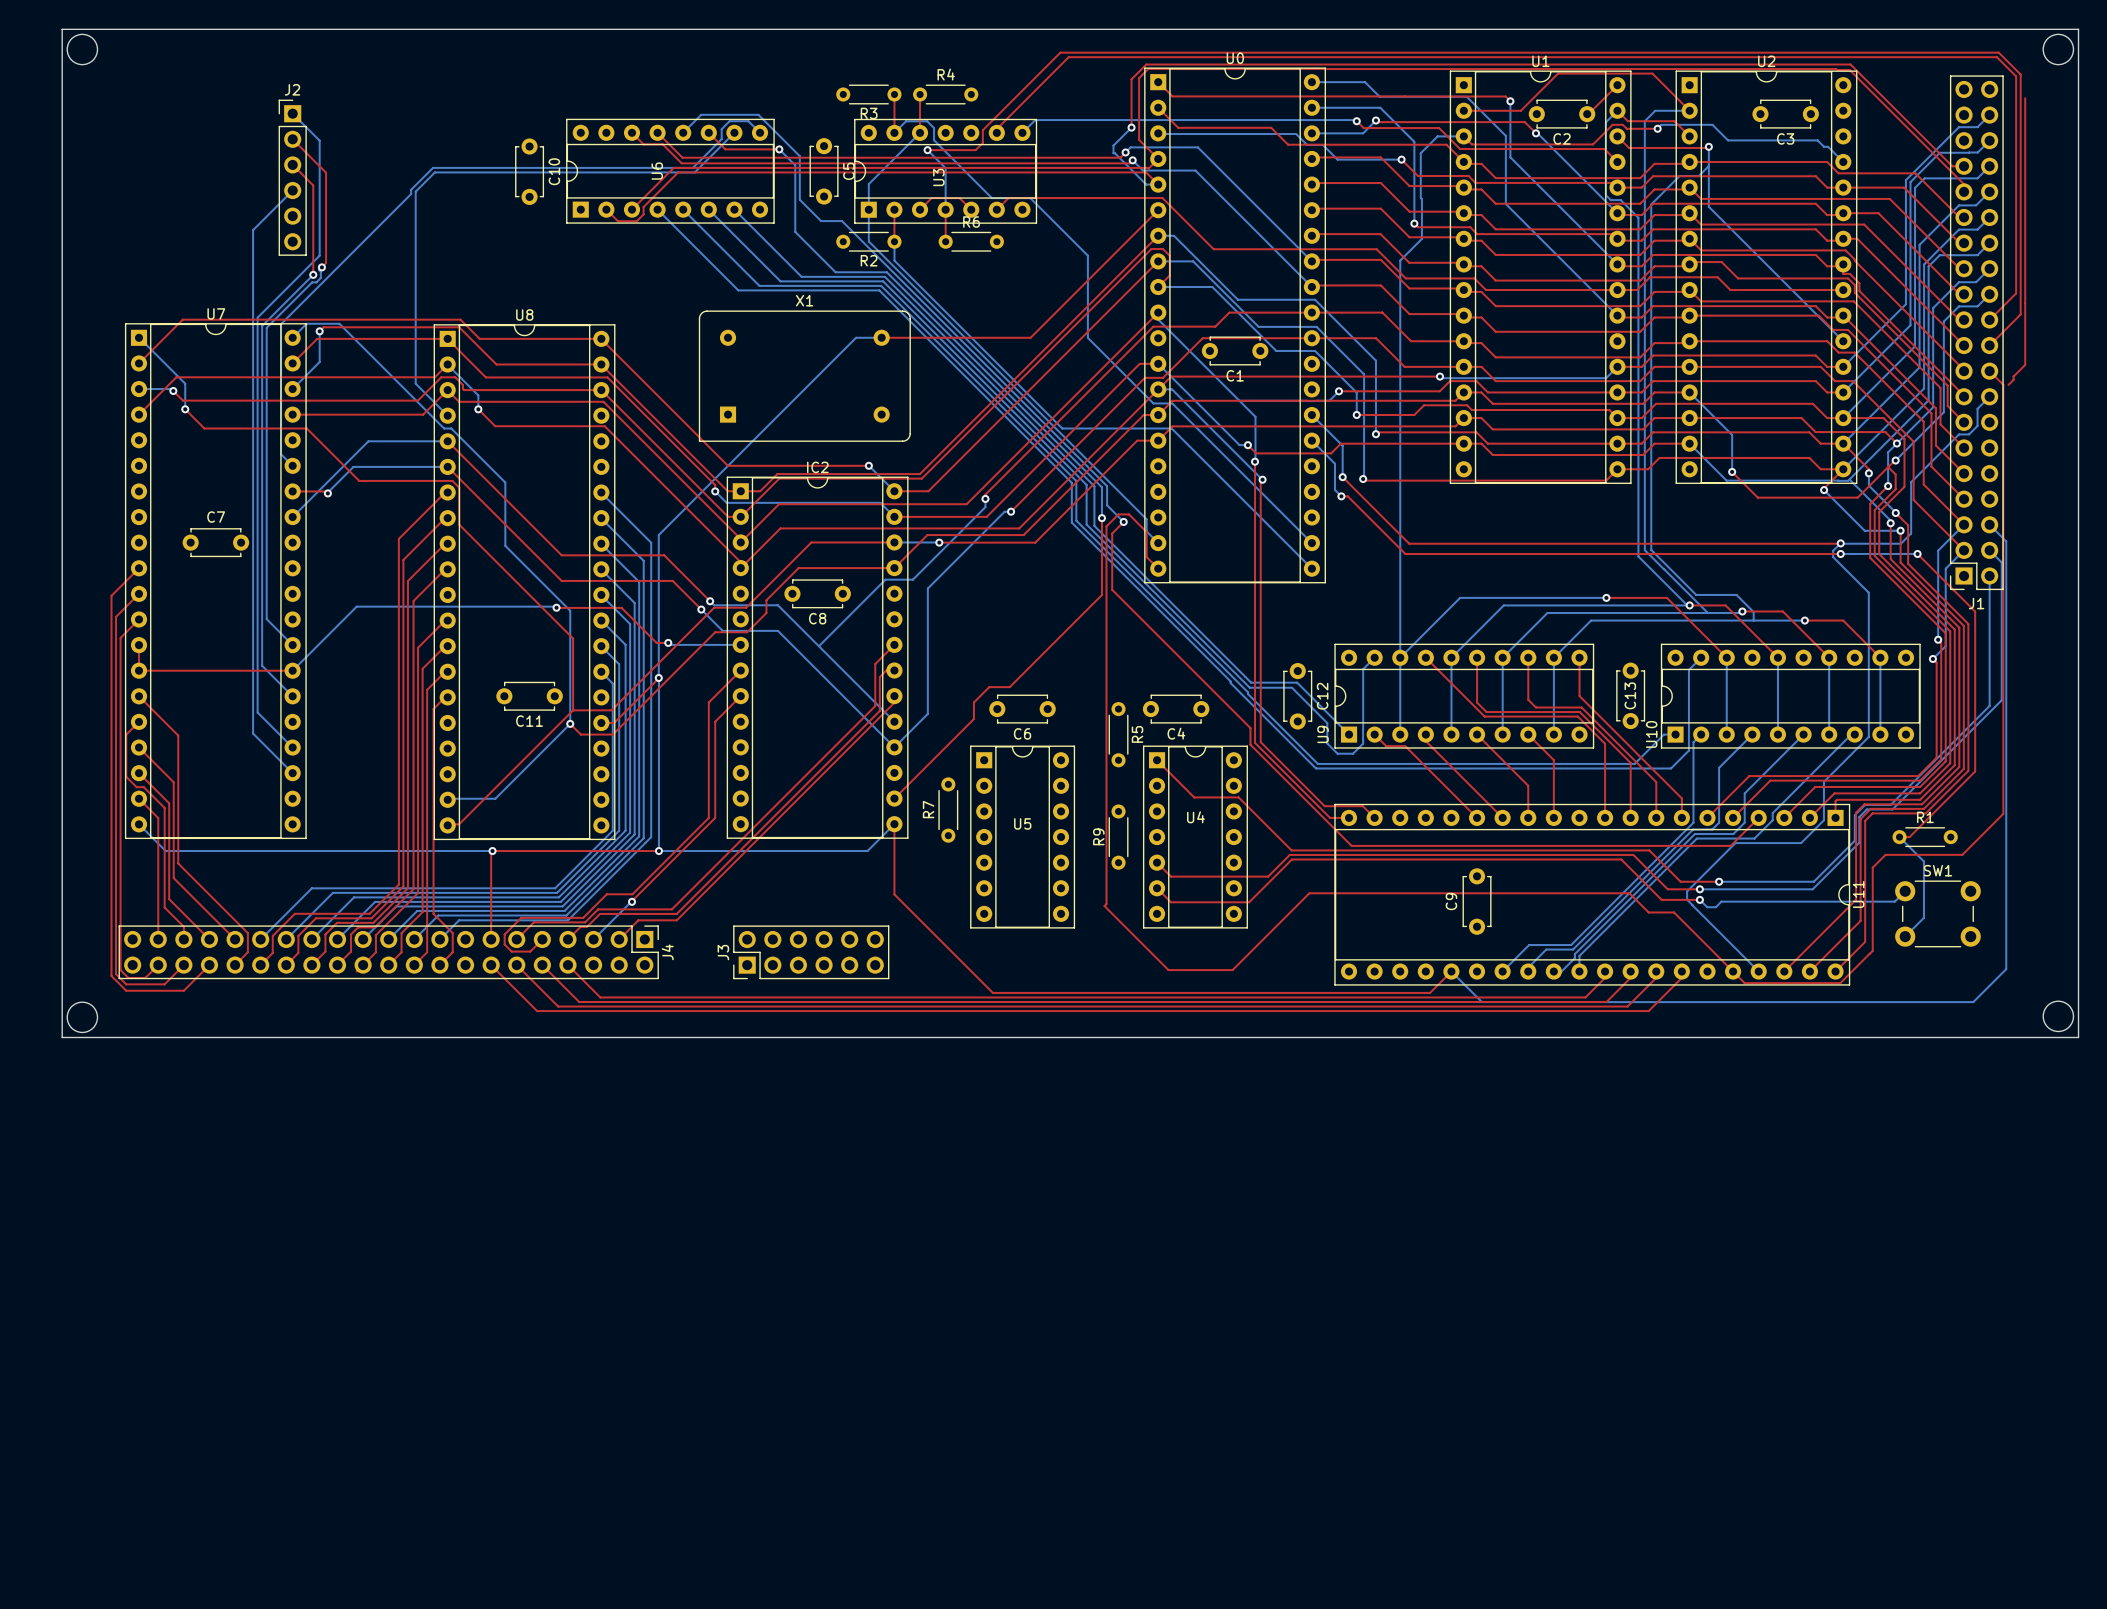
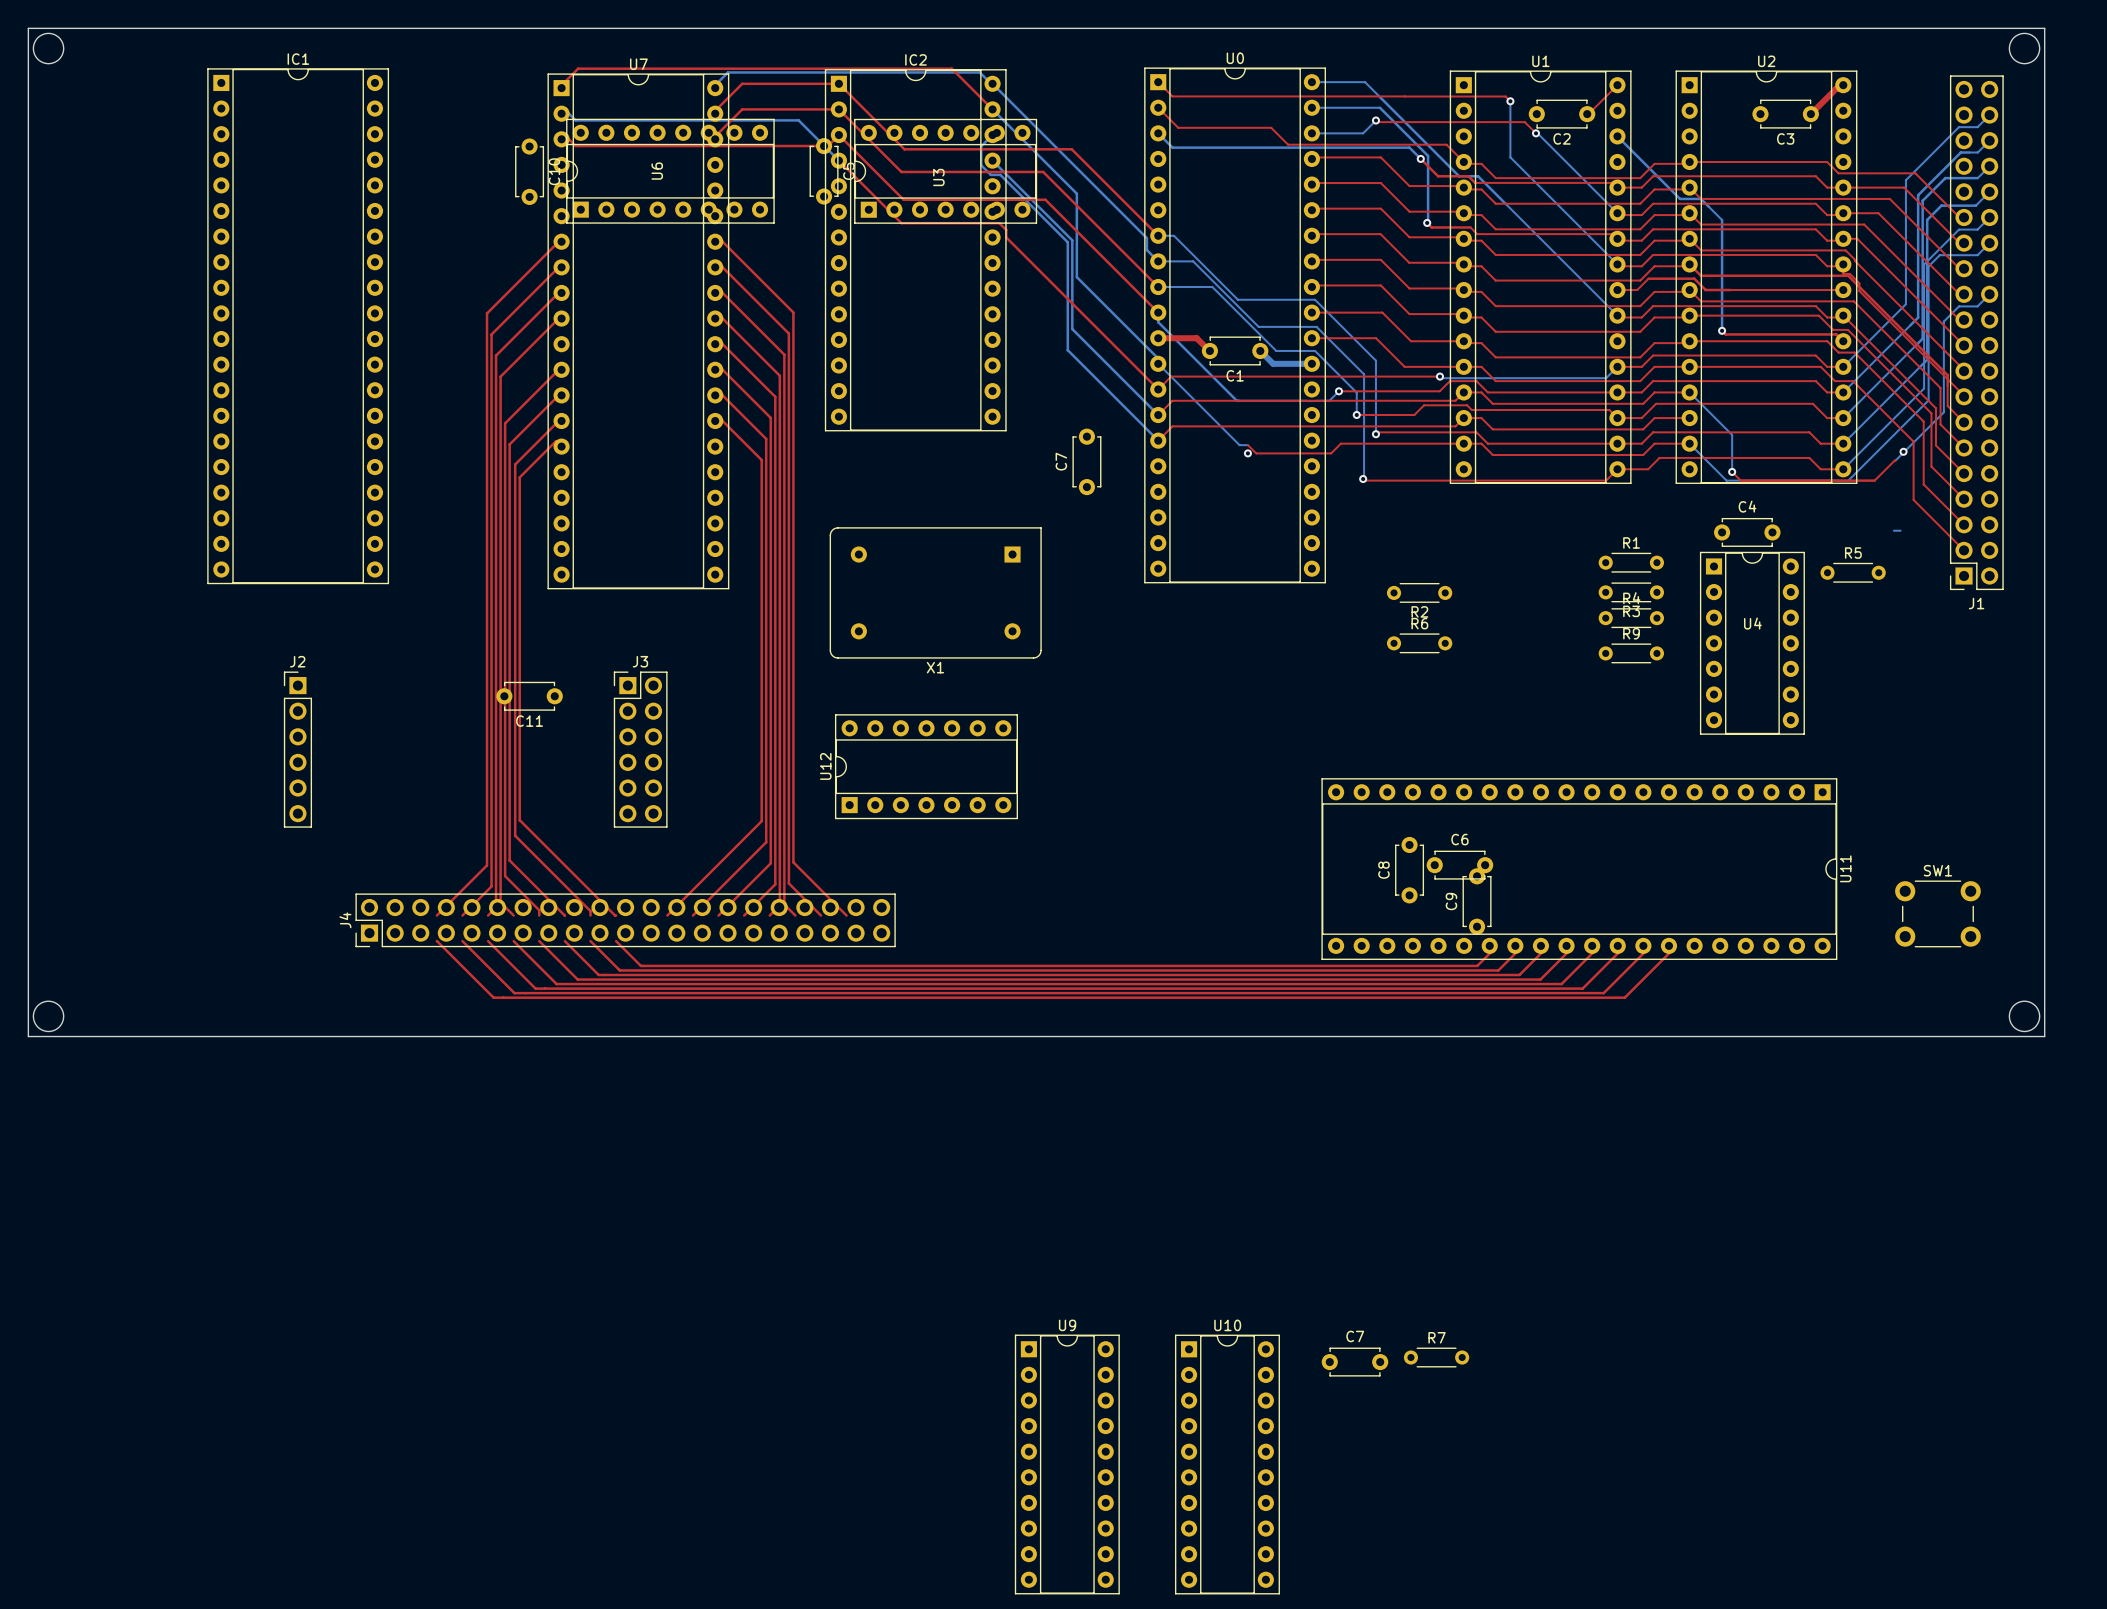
board edge: (62, 29) (2078, 29) (2078, 1037) (62, 1037) (62, 29) -> (28, 28) (2044, 28) (2044, 1036) (28, 1036) (28, 28)
round board edge position: (82, 49) -> (48, 48)
round board edge position: (2058, 49) -> (2024, 48)
top track: none -> (563, 82) (578, 68) (951, 68) (992, 109)
bottom track: none -> (717, 82) (727, 72) (979, 72) (1146, 238) (1146, 250) (1158, 261)
top track: none -> (1843, 85) (1839, 88) (1836, 88) (1810, 114)
R3 position: (868, 94) -> (1631, 592)
top track: (894, 94) (894, 132) -> none
top track: (920, 94) (920, 132) -> none
R4 position: (945, 94) -> (1631, 618)
bottom track: (1379, 96) (1466, 96) (1505, 135) (1505, 204) -> (1379, 96) (1459, 176) (1478, 176) (1505, 204)
top track: (2025, 98) (2025, 364) (2008, 384) -> none
bottom track: (1379, 107) (1414, 141) (1414, 223) -> (1379, 107) (1428, 155) (1427, 222)
bottom track: none -> (563, 108) (575, 120) (798, 120) (838, 160)
bottom track: none -> (992, 109) (1076, 193) (1076, 277) (1158, 358) (1158, 363)
top track: (1463, 110) (1520, 110) (1558, 73) (1652, 73) (1689, 110) -> none
top track: (1617, 110) (1627, 121) (1674, 121) (1689, 136) -> none
bottom track: (1617, 110) (1605, 122) (1605, 195) (1610, 200) (1620, 200) (1638, 217) (1638, 556) (1687, 605) -> none
bottom track: (1689, 110) (1655, 110) (1644, 121) (1644, 550) (1664, 569) -> none
bottom track: (292, 113) (319, 140) (319, 255) (257, 317) (257, 712) (292, 747) -> none
top track: (1356, 121) (1363, 128) (1439, 128) (1460, 148) (1604, 148) (1617, 162) -> none
bottom track: (1356, 121) (1035, 120) (1022, 132) -> none
via: (1356, 121) -> none
top track: (1131, 127) (1131, 79) (1146, 64) (1850, 64) (1952, 166) (1964, 166) -> none
bottom track: (1131, 127) (1113, 145) (1113, 153) (1146, 184) (1158, 184) -> none
via: (1131, 127) -> none
top track: (1657, 128) (1626, 128) (1622, 124) (1612, 124) (1593, 144) (1471, 144) (1463, 136) -> none
bottom track: (1657, 128) (1661, 124) (1712, 124) (1728, 140) (1817, 140) (1824, 146) (1828, 146) (1843, 162) -> none
via: (1657, 128) -> none
top track: (632, 132) (643, 144) (662, 144) (681, 163) (1129, 163) (1132, 160) -> none
top track: (657, 132) (682, 157) (1120, 157) (1125, 152) -> none
bottom track: (683, 132) (701, 114) (758, 114) (799, 156) (799, 199) (821, 221) (842, 221) (1107, 486) (1107, 505) (1123, 521) -> none
top track: (708, 132) (725, 149) (779, 149) -> none
bottom track: (734, 132) (694, 172) (434, 172) (415, 191) (415, 383) (447, 415) -> none
bottom track: (760, 132) (748, 121) (729, 121) (721, 129) (721, 139) (692, 167) (433, 167) (411, 189) (411, 194) (281, 324) (281, 454) (292, 465) -> none
bottom track: (894, 132) (906, 121) (927, 121) (934, 128) (934, 140) (991, 198) (1030, 198) (1087, 255) (1087, 337) (1153, 403) (1172, 403) (1311, 543) -> none
bottom track: (920, 132) (868, 184) (868, 241) (1146, 519) (1146, 531) (1158, 543) -> none
top track: (996, 132) (996, 129) (1068, 57) (1996, 57) (2016, 76) (2016, 293) (1989, 319) -> none
bottom track: (1158, 134) (1296, 134) (1307, 144) (1322, 144) (1337, 159) (1401, 159) -> (1158, 134) (1172, 147) (1409, 147) (1420, 158)
bottom track: none -> (992, 135) (981, 146) (981, 165) (990, 174) (1000, 174) (1067, 242) (1067, 350) (1158, 440)
bottom track: (1463, 136) (1437, 136) (1420, 153) (1421, 238) (1400, 260) (1400, 734) -> none
top track: (1617, 136) (1629, 147) (1708, 146) -> none
top track: (292, 139) (326, 172) (326, 263) (321, 267) -> none
bottom track: (1708, 146) (1708, 206) -> (1617, 136) (1680, 198) (1700, 198) (1708, 206)
via: (1708, 146) -> none
bottom track: (779, 149) (795, 165) (795, 231) (835, 272) (886, 272) (1101, 487) (1101, 518) -> none
via: (779, 149) -> none
top track: (927, 150) (975, 150) (982, 143) (982, 130) (1060, 52) (1998, 52) (2020, 74) (2020, 314) (1989, 345) -> none
bottom track: (927, 150) (945, 168) (945, 209) -> none
via: (927, 150) -> none
bottom track: (1125, 152) (1130, 147) (1197, 147) (1311, 261) -> none
via: (1125, 152) -> none
bottom track: (1969, 152) (1939, 152) (1910, 182) (1910, 325) -> (1969, 152) (1960, 152) (1918, 195) (1918, 317) (1910, 325)
top track: (1401, 159) (1417, 176) (1468, 176) (1475, 182) -> (1420, 158) (1438, 176) (1468, 176) (1475, 182)
via position: (1401, 159) -> (1420, 158)
bottom track: none -> (992, 160) (1072, 240) (1072, 329) (1158, 415)
bottom track: (1132, 160) (1142, 170) (1195, 170) (1311, 287) -> none
via: (1132, 160) -> none
top track: (292, 164) (313, 185) (313, 274) -> none
bottom track: (1708, 166) (1698, 176) (1679, 176) (1651, 204) (1651, 549) (1696, 594) (1736, 594) (1753, 612) (1753, 620) -> none
J2 position: (292, 177) -> (297, 749)
bottom track: (1977, 178) (1924, 178) (1915, 187) (1915, 346) -> (1977, 178) (1945, 178) (1922, 200) (1922, 338) (1915, 346)
top track: (1158, 184) (1146, 172) (678, 172) (643, 207) (643, 214) (636, 221) (617, 221) (606, 209) -> none
bottom track: (292, 190) (253, 230) (253, 733) (292, 773) -> none
top track: (1964, 191) (1964, 184) (1849, 70) (1148, 69) (1139, 78) (1139, 139) (1158, 158) (1148, 168) (673, 167) (632, 209) -> none
bottom track: (1976, 205) (1959, 205) (1919, 244) (1919, 367) -> (1976, 205) (1941, 205) (1927, 219) (1927, 359) (1919, 367)
bottom track: (657, 209) (738, 290) (879, 290) (1071, 482) (1071, 522) (1316, 768) (1671, 768) (1688, 750) (1688, 669) (1701, 657) -> none
bottom track: (683, 209) (759, 285) (881, 285) (1076, 481) (1076, 520) (1317, 763) (1634, 763) (1663, 734) (1675, 734) -> none
bottom track: (708, 209) (780, 281) (883, 281) (1086, 484) (1086, 524) (1249, 687) (1291, 687) (1327, 723) (1327, 743) (1337, 753) (1353, 753) (1363, 743) (1363, 739) -> none
bottom track: (734, 209) (801, 276) (884, 276) (1094, 486) (1094, 525) (1251, 682) (1297, 682) (1349, 734) -> none
top track: (894, 209) (894, 241) -> none
top track: (920, 209) (931, 198) (959, 198) (971, 209) -> none
top track: (945, 209) (945, 241) -> none
top track: (996, 209) (1008, 198) (1162, 198) (1213, 249) (1376, 249) (1405, 278) (1474, 278) (1486, 290) (1617, 290) -> none
top track: (1158, 210) (1030, 337) (881, 337) -> none
bottom track: (1722, 220) (1843, 341) -> (1722, 220) (1722, 330)
top track: (1414, 223) (1417, 227) (1470, 227) -> (1427, 222) (1431, 227) (1470, 227)
via position: (1414, 223) -> (1427, 222)
top track: (1158, 235) (919, 474) (777, 474) (760, 491) (727, 491) (599, 363) -> (1158, 235) (1071, 149) (904, 149) (838, 83) (742, 83) (717, 108)
top track: none -> (563, 236) (487, 313) (487, 865) (436, 915)
top track: none -> (717, 236) (793, 312) (793, 862) (846, 915)
R2 position: (868, 241) -> (1419, 592)
bottom track: (894, 241) (894, 260) (1062, 428) (1171, 428) (1311, 568) -> none
R6 position: (971, 241) -> (1419, 643)
top track: (1158, 261) (928, 491) (894, 491) -> none
top track: none -> (563, 262) (491, 334) (491, 886) (462, 915)
top track: none -> (717, 262) (788, 333) (788, 883) (820, 915)
top track: (1689, 264) (1692, 262) (1721, 262) (1738, 278) (1848, 278) (1854, 285) (1854, 292) (1947, 385) -> (1689, 264) (1700, 275) (1848, 275) (1947, 375) (1947, 385)
bottom track: (321, 267) (319, 270) (320, 277) (316, 282) (312, 282) (266, 327) (266, 619) (292, 645) -> none
via: (321, 267) -> none
bottom track: (1989, 268) (1976, 282) (1959, 282) (1933, 308) (1933, 407) (1888, 452) (1888, 486) -> none
bottom track: (313, 274) (262, 325) (262, 665) (292, 696) -> none
via: (313, 274) -> none
top track: (1648, 278) (1717, 277) (1730, 290) -> (1648, 278) (1694, 278) (1705, 290) (1730, 290)
top track: none -> (563, 287) (496, 355) (496, 907) (488, 915)
top track: none -> (717, 287) (784, 354) (784, 904) (795, 915)
top track: (1158, 287) (1169, 275) (1169, 255) (1163, 249) (1151, 249) (921, 478) (779, 478) (740, 516) (727, 516) (601, 390) (464, 390) (462, 384) (455, 377) (441, 377) (417, 400) (182, 400) (173, 391) -> (1158, 287) (1043, 171) (901, 171) (838, 109) (742, 109) (717, 134)
top track: (1158, 312) (966, 504) (779, 504) (740, 542) (740, 539) (603, 401) (459, 401) (446, 389) -> (1158, 312) (1045, 199) (903, 199) (838, 135) (827, 146) (575, 146) (563, 134)
top track: (1311, 312) (1229, 312) (1215, 326) (1153, 326) (985, 494) (985, 498) -> none
top track: none -> (563, 313) (500, 376) (500, 902) (513, 915)
top track: none -> (717, 313) (779, 375) (779, 905) (769, 915)
bottom track: (1158, 319) (1255, 416) (1255, 461) -> (1158, 319) (1158, 322) (1236, 400) (1239, 400)
IC1: none -> (298, 326)
top track: none -> (1722, 330) (1725, 334) (1836, 334) (1843, 341)
via: none -> (1722, 330)
top track: (319, 331) (323, 327) (459, 327) (496, 364) (601, 364) -> none
bottom track: (319, 331) (319, 362) (292, 389) -> none
via: (319, 331) -> none
bottom track: (139, 337) (185, 383) (185, 409) -> none
bottom track: (292, 337) (306, 323) (339, 323) (444, 428) (451, 428) (505, 482) (505, 545) (570, 610) (570, 723) (495, 798) (446, 798) -> none
top track: (446, 337) (485, 377) (607, 377) (715, 485) (715, 491) -> none
top track: (599, 337) (727, 465) (868, 465) -> none
bottom track: (881, 337) (856, 337) (658, 535) (658, 851) (867, 851) (894, 824) -> none
top track: (447, 338) (317, 338) (292, 363) -> none
top track: (601, 338) (479, 338) (460, 319) (182, 319) (139, 363) -> none
top track: none -> (1158, 338) (1196, 338) (1209, 350)
top track: (1311, 338) (1202, 338) (1163, 377) (1144, 377) (1011, 511) -> none
top track: none -> (717, 339) (775, 396) (775, 884) (744, 915)
bottom track: none -> (1260, 350) (1273, 363) (1311, 363)
bottom track: (446, 363) (478, 395) (478, 409) -> none
top track: (1158, 363) (1139, 363) (986, 516) (894, 516) -> none
top track: (447, 364) (434, 377) (176, 377) (139, 414) -> none
top track: none -> (563, 364) (505, 423) (505, 876) (539, 910) (539, 915)
top track: none -> (717, 364) (770, 417) (770, 863) (718, 915)
top track: (1989, 371) (2003, 384) (2003, 813) (1962, 854) (1885, 854) (1872, 867) (1872, 950) (1869, 953) -> none
X1 rotation: 0° (804, 376) -> 180° (935, 592)
X1 position: (804, 376) -> (935, 592)
bottom track: (139, 389) (171, 389) (173, 391) -> none
top track: (1158, 389) (1019, 528) (780, 528) (740, 568) (740, 562) (604, 426) (495, 426) (478, 409) -> (1158, 389) (1006, 237) (1006, 230) (999, 223) (901, 223) (838, 160)
bottom track: (1158, 389) (1172, 389) (1262, 479) -> none
top track: (447, 390) (423, 414) (292, 414) -> none
top track: none -> (563, 390) (509, 444) (509, 860) (564, 915)
top track: none -> (717, 390) (766, 438) (766, 842) (692, 915)
via: (173, 391) -> none
bottom track: (1989, 396) (1977, 408) (1977, 425) (1969, 434) (1958, 434) (1911, 482) (1911, 533) (1900, 543) (1840, 543) -> none
top track: (185, 409) (204, 428) (306, 428) (359, 480) (452, 480) (459, 487) (459, 524) (573, 638) (573, 710) -> none
via: (185, 409) -> none
via: (478, 409) -> none
top track: none -> (563, 415) (515, 464) (515, 835) (590, 911) (590, 915)
top track: none -> (717, 415) (761, 460) (761, 821) (667, 915)
top track: (1158, 415) (1143, 415) (1023, 535) (927, 535) (894, 568) (798, 568) (766, 600) (766, 613) (747, 632) (715, 632) (612, 734) (580, 734) (570, 723) -> none
bottom track: (1311, 415) (1342, 445) (1342, 477) -> none
top track: (1689, 418) (1801, 418) (1815, 432) (1885, 432) (1896, 443) -> none
top track: (1843, 418) (1883, 418) (1904, 439) (1904, 486) (1879, 512) (1879, 554) (1954, 629) (1954, 765) (1920, 799) (1836, 799) (1835, 817) -> none
top track: (1158, 440) (1137, 440) (1035, 542) (939, 542) -> none
bottom track: (1311, 440) (1335, 463) (1335, 489) (1341, 496) -> none
top track: (447, 441) (561, 555) (664, 555) (710, 601) -> none
bottom track: (447, 441) (368, 441) (292, 517) -> none
top track: none -> (563, 441) (555, 441) (519, 477) (519, 820) (616, 915)
top track: (1843, 443) (1868, 469) (1868, 473) -> none
via: (1896, 443) -> none
via: (1247, 445) -> none
via: none -> (1903, 451)
via: none -> (1247, 453)
via: (1895, 460) -> none
C7: none -> (1086, 461)
top track: (1255, 461) (1255, 742) (1330, 817) (1349, 817) -> none
via: (1255, 461) -> none
bottom track: (868, 465) (894, 491) -> none
via: (868, 465) -> none
top track: (447, 466) (561, 580) (672, 580) (701, 609) -> none
bottom track: (447, 466) (353, 466) (327, 493) -> none
top track: (1888, 467) (1895, 474) (1895, 489) (1874, 510) (1874, 555) (1950, 631) (1950, 763) (1920, 793) (1834, 793) (1809, 817) -> none
top track: (1843, 469) (1824, 490) -> none
bottom track: (1868, 473) (1868, 485) (1895, 513) -> none
via: (1868, 473) -> none
top track: (1342, 477) (1409, 543) (1840, 543) -> none
via: (1342, 477) -> none
top track: (1262, 479) (1260, 481) (1260, 742) (1324, 806) (1362, 806) (1374, 817) -> none
via: (1262, 479) -> none
bottom track: (1849, 479) (1890, 520) (1890, 523) -> none
top track: (1740, 480) (1757, 497) (1857, 497) (1874, 480) -> (1740, 480) (1874, 480)
top track: (1888, 486) (1870, 504) (1870, 557) (1945, 633) (1945, 761) (1920, 787) (1815, 787) (1784, 817) -> none
via: (1888, 486) -> none
bottom track: (1824, 490) (1864, 530) (1893, 530) -> none
via: (1824, 490) -> none
top track: (292, 491) (325, 491) (327, 493) -> none
top track: (446, 491) (398, 538) (398, 884) (369, 913) (294, 913) (272, 935) (272, 953) (260, 965) -> none
bottom track: (599, 491) (651, 542) (651, 837) (568, 920) (459, 920) (439, 939) -> none
bottom track: (715, 491) (726, 502) (880, 502) (894, 516) -> none
via: (715, 491) -> none
via: (327, 493) -> none
top track: (1341, 496) (1347, 496) (1405, 553) (1840, 553) -> none
via: (1341, 496) -> none
bottom track: (985, 498) (985, 507) (912, 579) (885, 579) (819, 646) -> none
via: (985, 498) -> none
bottom track: (1011, 511) (1004, 511) (927, 588) (927, 713) (894, 747) (777, 630) (722, 630) (701, 609) -> none
via: (1011, 511) -> none
top track: (1895, 513) (1908, 525) (1908, 563) (1968, 623) (1968, 770) (1925, 813) (1872, 813) (1865, 820) (1865, 941) (1835, 971) -> none
via: (1895, 513) -> none
top track: (446, 517) (403, 559) (403, 886) (371, 918) (315, 918) (298, 935) (298, 953) (286, 965) -> none
bottom track: (599, 517) (643, 560) (643, 838) (566, 915) (438, 915) (414, 939) -> none
top track: (1101, 518) (1101, 594) (1009, 687) (989, 687) (973, 702) (973, 719) (894, 798) (894, 795) -> none
via: (1101, 518) -> none
top track: (1123, 521) (1112, 533) (1112, 589) (1250, 728) (1250, 744) (1351, 845) (1730, 845) (1758, 817) -> none
via: (1123, 521) -> none
top track: (1890, 523) (1890, 559) (1959, 627) (1959, 767) (1922, 804) (1864, 804) (1856, 812) (1856, 899) (1784, 971) -> none
via: (1890, 523) -> none
bottom track: (1964, 524) (1938, 550) (1938, 639) -> none
bottom track: (1989, 524) (2006, 541) (2006, 969) (1973, 1002) (1481, 1002) (1451, 971) -> none
top track: (1900, 530) (1900, 562) (1963, 625) (1963, 768) (1923, 808) (1870, 808) (1860, 819) (1860, 920) (1809, 971) -> none
via: (1900, 530) -> none
C7: (215, 542) -> none
top track: (446, 542) (407, 581) (407, 888) (373, 922) (337, 922) (325, 934) (325, 951) (311, 965) -> none
bottom track: (599, 542) (639, 581) (639, 836) (564, 910) (417, 910) (388, 939) -> none
top track: (894, 542) (811, 542) (746, 607) (714, 607) (611, 710) (573, 710) -> none
bottom track: (894, 542) (939, 542) -> none
via: (939, 542) -> none
bottom track: (1840, 543) (1833, 550) (1833, 557) (1868, 592) (1868, 736) (1823, 781) (1823, 820) (1801, 843) (1735, 843) (1687, 891) (1687, 899) (1758, 971) -> none
via: (1840, 543) -> none
bottom track: (1964, 550) (1945, 568) (1945, 646) (1932, 658) -> none
bottom track: (1989, 550) (2001, 562) (2001, 700) (1892, 809) (1866, 809) (1859, 817) (1859, 842) (1812, 889) (1699, 889) -> none
bottom track: (1840, 553) (1917, 553) -> none
via: (1840, 553) -> none
top track: (1917, 553) (1975, 611) (1975, 771) (1909, 837) (1899, 837) -> none
via: (1917, 553) -> none
top track: (139, 568) (111, 595) (111, 976) (126, 990) (183, 990) (209, 965) -> none
top track: (446, 568) (413, 601) (413, 889) (375, 927) (358, 927) (351, 934) (351, 951) (337, 965) -> none
bottom track: (599, 568) (634, 603) (634, 834) (562, 906) (396, 906) (363, 939) -> none
top track: (1158, 568) (1146, 557) (1146, 532) (1128, 514) (1118, 514) (1106, 526) (1106, 904) (1104, 906) (1168, 970) (1232, 970) (1309, 893) (1629, 893) (1648, 912) (1674, 912) (1744, 983) (1840, 983) (1869, 953) -> none
bottom track: (1664, 569) (1707, 612) -> none
bottom track: (1989, 575) (1989, 705) (1890, 804) (1865, 804) (1854, 815) (1854, 840) (1813, 881) (1719, 881) -> none
U7 position: (215, 581) -> (638, 331)
U8: (524, 582) -> none
top track: (139, 593) (116, 616) (116, 974) (126, 984) (164, 984) -> none
bottom track: (599, 593) (630, 624) (630, 832) (560, 901) (375, 901) (337, 939) -> none
C8 rotation: 0° (817, 593) -> 90° clockwise (1409, 870)
C8 position: (817, 593) -> (1409, 870)
top track: (1606, 597) (1666, 597) (1726, 657) -> none
bottom track: (1606, 597) (1460, 597) (1400, 657) -> none
via: (1606, 597) -> none
bottom track: (710, 601) (714, 605) (777, 605) (894, 721) -> none
via: (710, 601) -> none
top track: (1689, 605) (1725, 605) (1777, 657) -> none
via: (1689, 605) -> none
bottom track: (1691, 605) (1503, 605) (1451, 657) (1451, 734) -> none
top track: (556, 607) (621, 607) (656, 642) (668, 642) -> none
bottom track: (556, 607) (356, 606) (292, 670) -> none
via: (556, 607) -> none
via: (701, 609) -> none
top track: (1742, 611) (1782, 611) (1829, 657) -> none
bottom track: (1742, 611) (1740, 613) (1547, 613) (1502, 657) (1502, 734) -> none
via: (1742, 611) -> none
top track: (139, 619) (120, 637) (120, 970) (128, 977) (145, 977) (158, 965) -> none
top track: (446, 619) (418, 647) (418, 893) (375, 935) (375, 952) (356, 971) -> none
bottom track: (601, 620) (625, 644) (625, 830) (558, 897) (354, 897) (311, 939) -> none
top track: (1804, 620) (1843, 620) (1880, 657) -> none
bottom track: (1804, 620) (1591, 620) (1553, 657) (1553, 734) -> none
via: (1804, 620) -> none
top track: (1938, 639) (1941, 642) (1941, 759) (1920, 780) (1770, 780) (1733, 817) -> none
via: (1938, 639) -> none
bottom track: (668, 642) (670, 644) (740, 644) -> none
via: (668, 642) -> none
top track: (894, 644) (875, 664) (875, 706) (671, 909) (598, 909) (585, 922) (533, 922) (516, 939) -> none
top track: (139, 645) (139, 670) (292, 670) -> none
top track: (446, 645) (422, 668) (422, 912) (401, 933) (401, 952) (388, 965) -> none
bottom track: (599, 645) (619, 664) (619, 830) (557, 892) (332, 892) (286, 939) -> none
IC2 position: (817, 657) -> (915, 250)
bottom track: (1374, 657) (1363, 669) (1363, 729) -> none
top track: (1425, 657) (1484, 716) (1577, 716) (1605, 743) (1605, 817) -> none
top track: (1477, 657) (1477, 702) (1486, 712) (1579, 712) (1630, 762) (1630, 817) -> none
top track: (1528, 657) (1528, 699) (1536, 707) (1581, 707) (1656, 782) (1656, 817) -> none
top track: (1579, 657) (1579, 696) (1681, 798) (1681, 817) -> none
bottom track: (1726, 657) (1726, 734) -> none
bottom track: (1777, 657) (1777, 734) -> none
bottom track: (1829, 657) (1829, 734) -> none
bottom track: (1880, 657) (1880, 734) -> none
top track: (1932, 658) (1936, 662) (1936, 757) (1918, 776) (1749, 776) (1707, 817) -> none
via: (1932, 658) -> none
top track: (446, 670) (427, 689) (427, 952) (414, 965) -> none
bottom track: (599, 670) (612, 683) (612, 830) (555, 888) (311, 888) (260, 939) -> none
top track: (740, 670) (708, 702) (708, 817) (632, 894) (606, 894) (583, 917) (521, 917) (504, 934) (504, 944) (511, 951) (530, 951) (542, 939) -> none
top track: (894, 670) (886, 670) (879, 677) (879, 710) (676, 913) (670, 913) -> none
top track: (658, 678) (614, 722) (601, 722) -> none
via: (658, 678) -> none
C13: (1630, 695) -> none
top track: (139, 696) (178, 735) (178, 863) (247, 933) (247, 952) (235, 965) -> none
top track: (446, 696) (433, 709) (433, 913) (452, 933) (452, 952) (439, 965) -> none
top track: (740, 696) (715, 721) (715, 817) (632, 901) -> none
top track: (894, 696) (894, 702) (676, 920) (638, 920) (619, 939) -> none
C12: (1297, 696) -> none
U9 rotation: 0° (1464, 696) -> 90° clockwise (1067, 1464)
U9 position: (1464, 696) -> (1067, 1464)
U10 rotation: 0° (1790, 696) -> 90° clockwise (1227, 1464)
U10 position: (1790, 696) -> (1227, 1464)
C6 position: (1022, 709) -> (1459, 865)
C4 position: (1176, 709) -> (1747, 532)
top track: (573, 710) (459, 824) (446, 824) -> none
top track: (139, 721) (126, 734) (126, 776) (136, 787) (143, 787) (164, 808) (164, 907) (183, 926) (183, 939) -> none
via: (570, 723) -> none
bottom track: (1363, 729) (1363, 739) -> none
C6 name position: C6 (1022, 733) -> C6 (1459, 839)
C4 name position: C4 (1176, 733) -> C4 (1747, 506)
R5 rotation: 0° (1118, 734) -> 90° clockwise (1853, 572)
R5 position: (1118, 734) -> (1853, 572)
R5 name position: R5 (1137, 734) -> R5 (1853, 553)
U9 name position: U9 (1323, 734) -> U9 (1067, 1325)
top track: (1374, 734) (1386, 746) (1405, 746) (1477, 817) -> none
top track: (1425, 734) (1425, 741) (1502, 817) -> none
top track: (1477, 734) (1528, 785) (1528, 817) -> none
top track: (1528, 734) (1553, 760) (1553, 817) -> none
U10 name position: U10 (1651, 734) -> U10 (1227, 1325)
bottom track: (1701, 734) (1693, 742) (1693, 822) (1571, 945) (1529, 945) (1502, 971) -> none
bottom track: (1752, 734) (1719, 767) (1719, 822) (1712, 829) (1693, 829) (1573, 949) (1546, 949) (1528, 967) (1528, 971) -> none
bottom track: (1803, 734) (1744, 793) (1744, 822) (1733, 834) (1694, 834) (1574, 954) (1574, 958) (1561, 971) (1553, 971) -> none
bottom track: (1854, 734) (1851, 734) (1772, 813) (1772, 820) (1754, 838) (1696, 838) (1579, 955) (1579, 971) -> none
top track: (139, 747) (173, 782) (173, 878) (235, 939) -> none
top track: (1157, 760) (1194, 797) (1238, 797) (1291, 850) (1649, 850) (1680, 881) (1719, 881) -> none
U12: none -> (926, 766)
top track: (139, 773) (169, 803) (169, 899) (209, 939) -> none
top track: (139, 798) (158, 818) (158, 939) -> none
R7 rotation: 0° (948, 810) -> 90° clockwise (1436, 1357)
R7 position: (948, 810) -> (1436, 1357)
bottom track: (139, 824) (165, 851) (492, 851) -> none
top track: (894, 824) (894, 894) (992, 992) (1430, 992) (1451, 971) -> none
U5: (1022, 837) -> none
R9 rotation: 0° (1118, 837) -> 90° clockwise (1631, 653)
R9 position: (1118, 837) -> (1631, 653)
U4 position: (1195, 837) -> (1752, 643)
bottom track: (1899, 837) (1923, 861) (1923, 917) (1905, 936) -> none
R1 position: (1925, 837) -> (1631, 562)
via: (492, 851) -> none
top track: (658, 851) (492, 851) (491, 939) -> none
via: (658, 851) -> none
top track: (1157, 862) (1171, 876) (1268, 876) (1289, 854) (1633, 854) (1667, 889) (1699, 889) -> none
via: (1719, 881) -> none
top track: (1157, 888) (1171, 902) (1249, 902) (1291, 859) (1621, 859) (1661, 899) (1699, 899) -> none
via: (1699, 889) -> none
bottom track: (1905, 891) (1894, 901) (1721, 901) (1715, 907) (1707, 907) (1699, 899) -> none
U11 position: (1592, 894) -> (1579, 869)
via: (1699, 899) -> none
bottom track: (632, 901) (593, 939) -> none
via: (632, 901) -> none
top track: (670, 913) (600, 913) (587, 926) (580, 926) (567, 939) -> none
top track: none -> (437, 941) (493, 997) (1624, 997) (1670, 951)
top track: none -> (462, 941) (514, 993) (1603, 993) (1644, 951)
top track: none -> (488, 941) (535, 988) (1582, 988) (1619, 951)
top track: none -> (513, 941) (556, 984) (1561, 984) (1593, 951)
top track: none -> (539, 941) (577, 979) (1540, 979) (1568, 951)
top track: none -> (564, 941) (598, 975) (1519, 975) (1542, 951)
top track: none -> (590, 941) (619, 970) (1498, 970) (1516, 951)
top track: none -> (616, 941) (640, 965) (1477, 965) (1491, 951)
J4 rotation: 0° (388, 952) -> 180° (625, 920)
J3 rotation: 0° (811, 952) -> 90° clockwise (640, 749)
J3 position: (811, 952) -> (640, 749)
top track: (183, 965) (164, 984) -> none
top track: (491, 965) (537, 1011) (1648, 1011) (1681, 977) -> none
top track: (516, 965) (558, 1006) (1627, 1006) (1656, 977) -> none
top track: (542, 965) (579, 1002) (1606, 1002) (1630, 977) -> none
top track: (567, 965) (600, 997) (1585, 997) (1605, 977) -> none
round board edge position: (2058, 1016) -> (2024, 1016)
round board edge position: (82, 1017) -> (48, 1016)
C7: none -> (1355, 1362)

